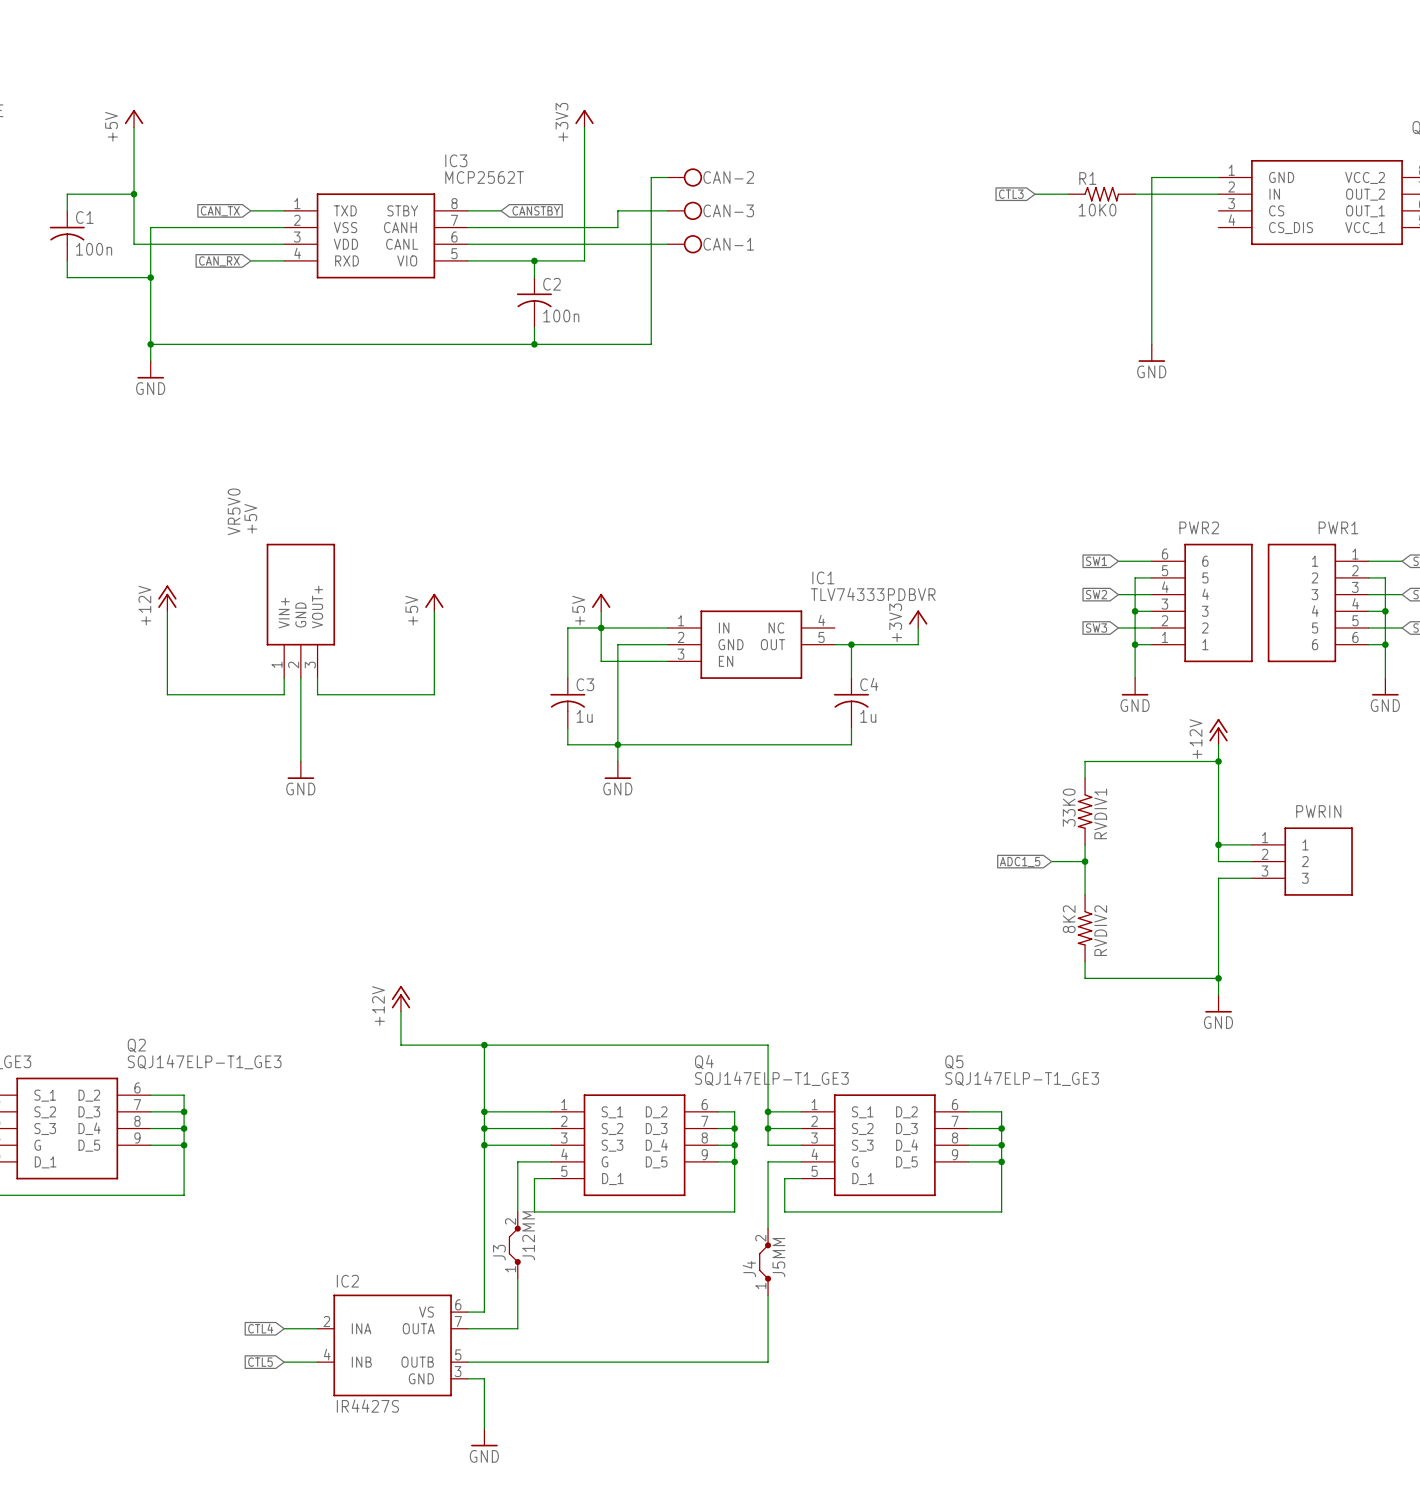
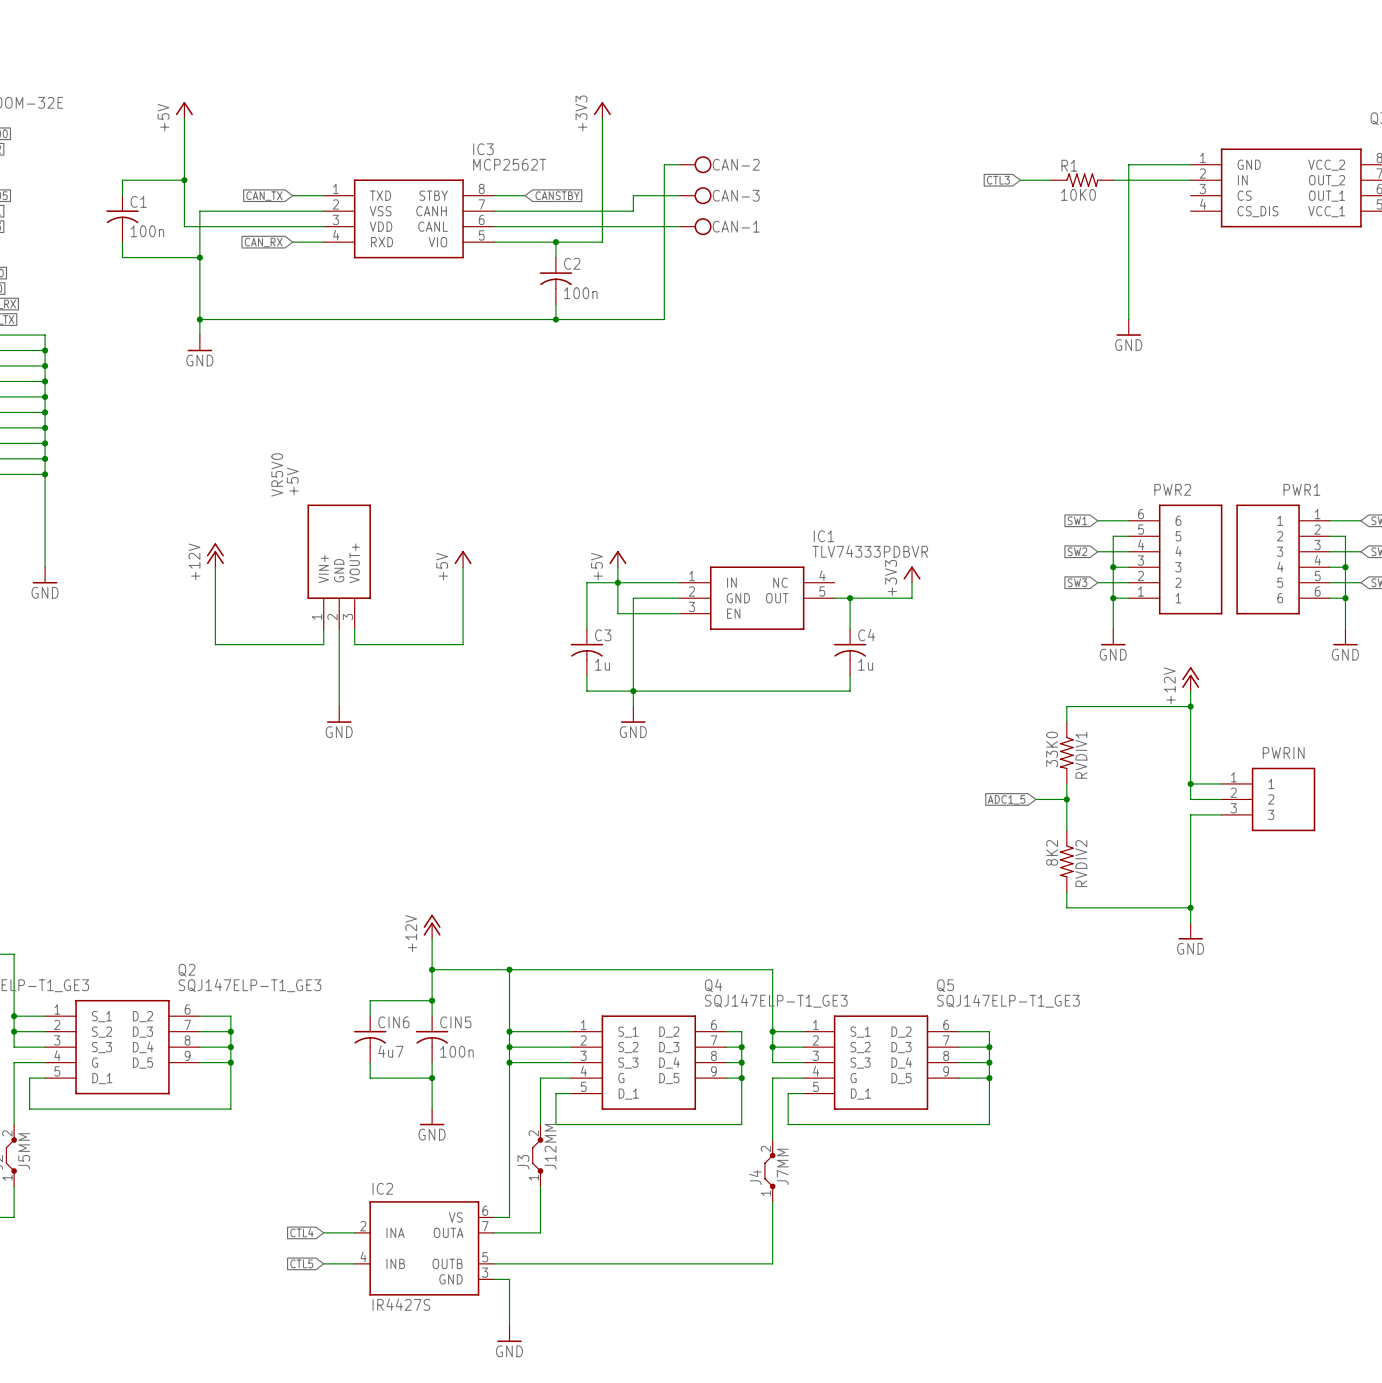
wire: none -> (432, 969) (432, 1016)
junction: none -> (432, 969)
wire: none -> (432, 1000) (370, 1000) (370, 1016)
junction: none -> (432, 1000)
CIN6: none -> 4u7 (370, 1039)
CIN5: none -> 100n (432, 1039)
wire: none -> (370, 1062) (370, 1078) (432, 1078)
wire: none -> (432, 1062) (432, 1109)
junction: none -> (432, 1078)
power symbol: none -> GND (432, 1117)
J4 value: J5MM (778, 1257) -> J7MM (782, 1166)

